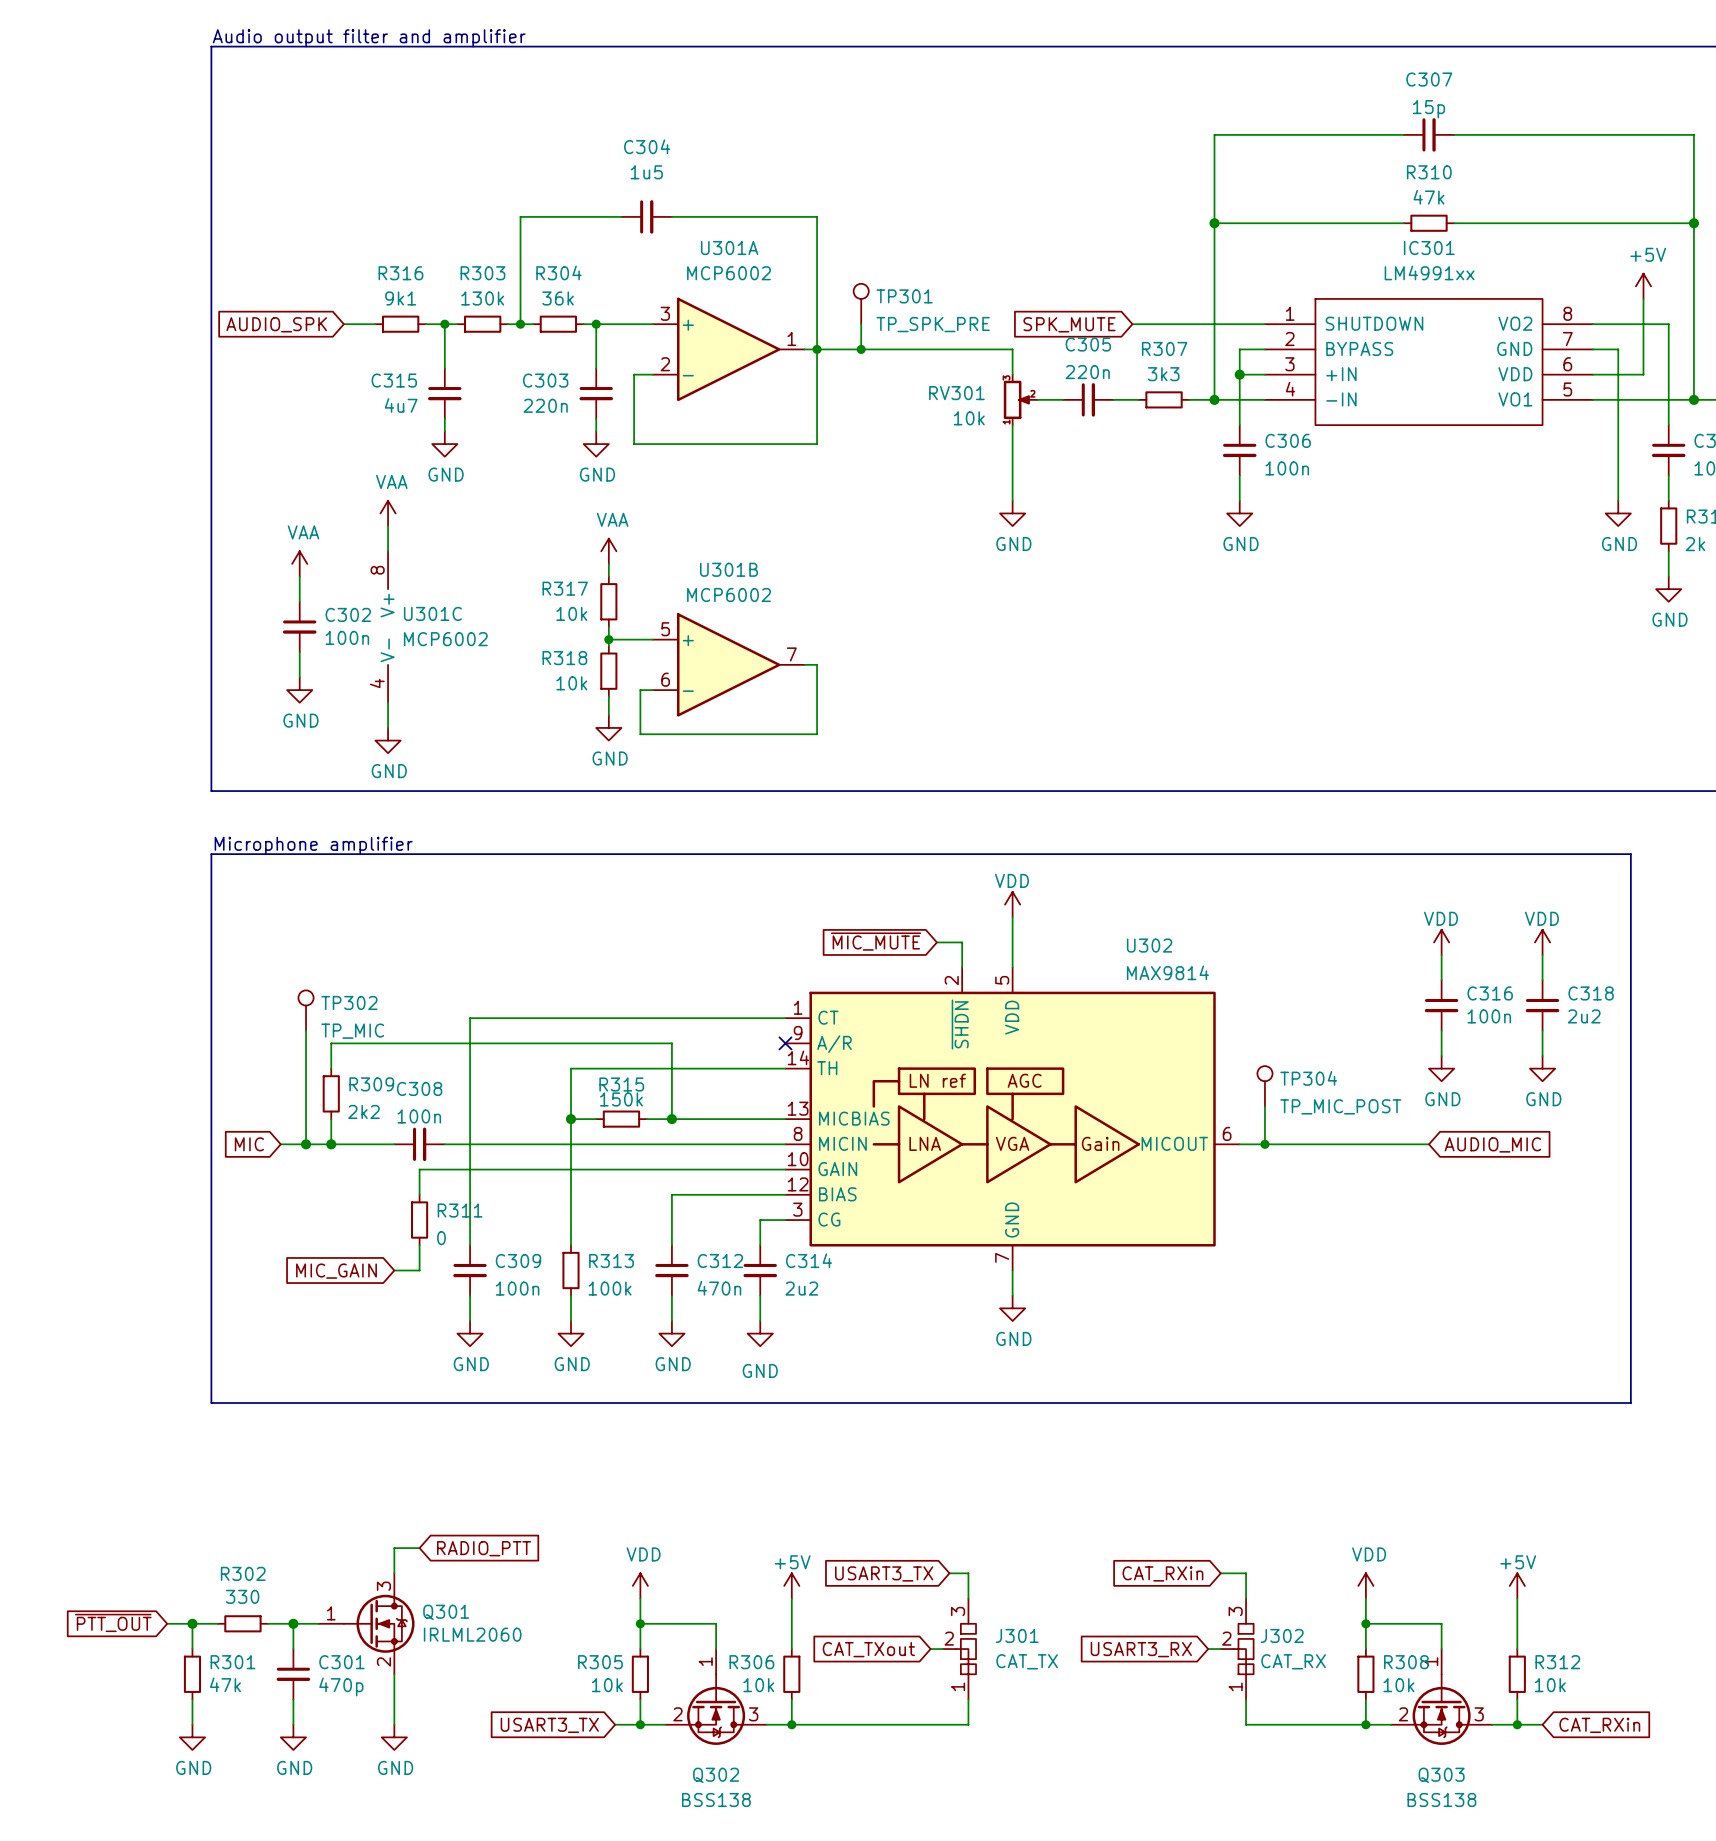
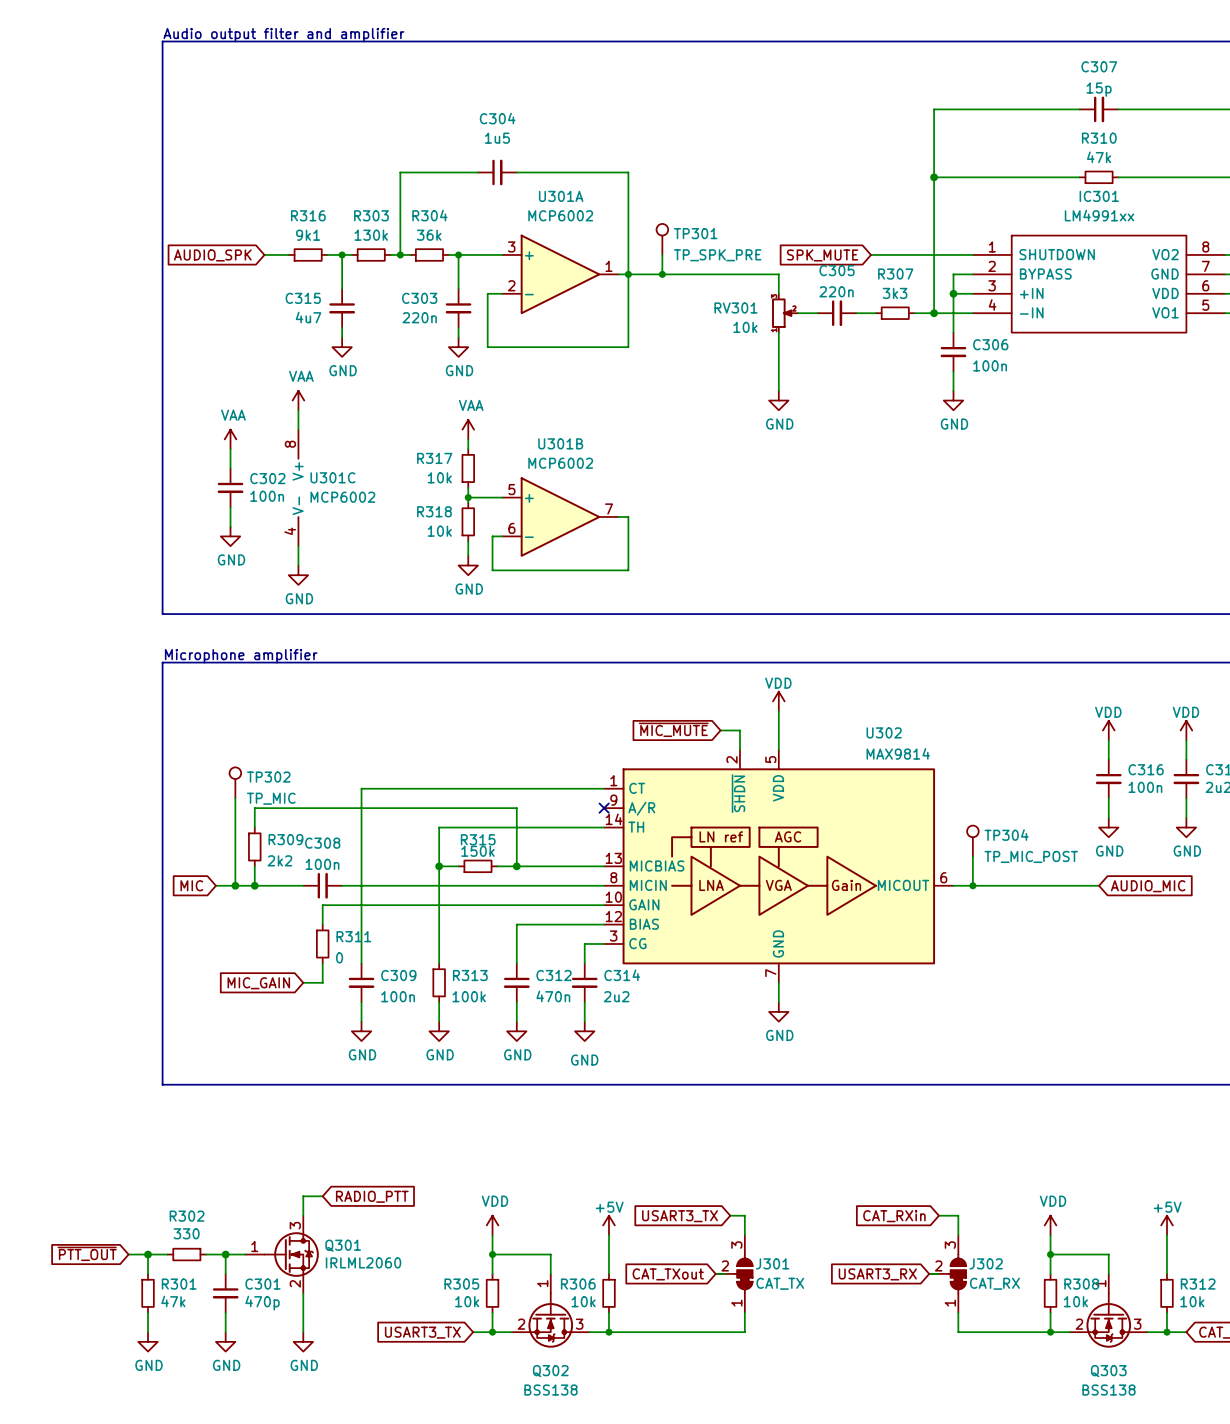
J301 symbol: [943, 1598, 977, 1700] -> [715, 1235, 753, 1313]
J302 symbol: [1220, 1598, 1254, 1700] -> [929, 1235, 967, 1313]

